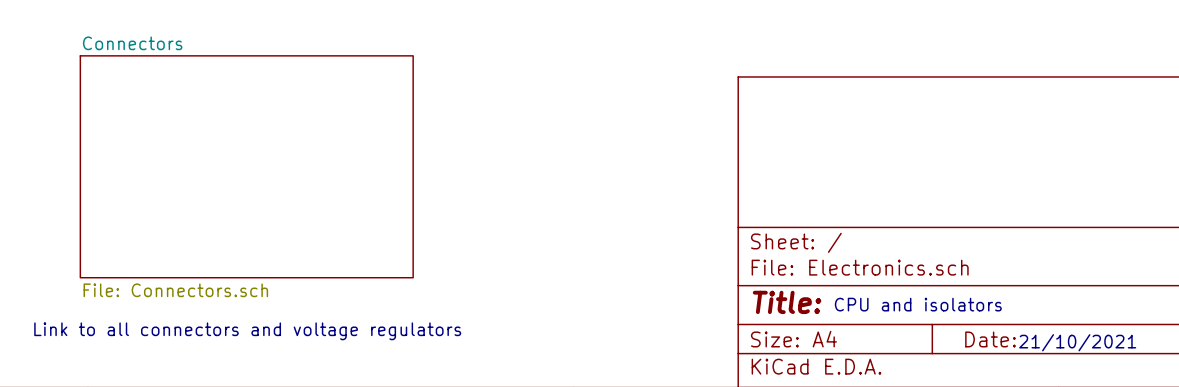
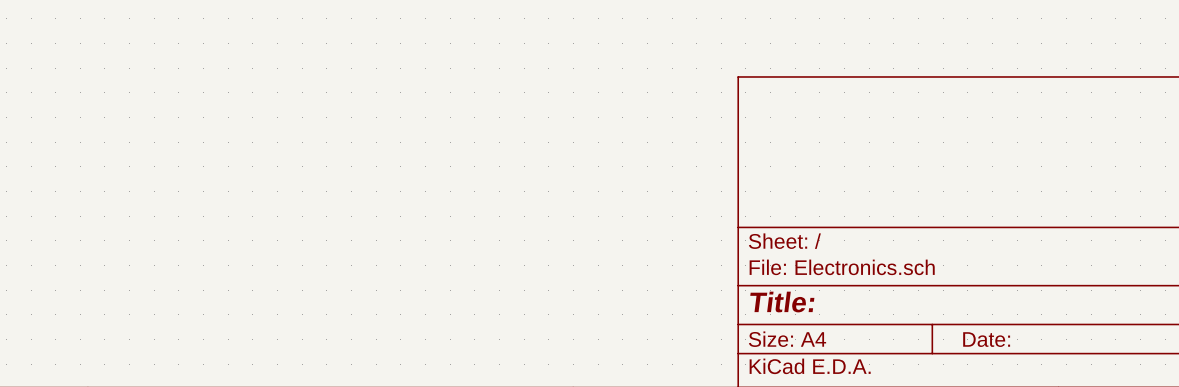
sheet Connectors: File: Connectors.sch (246, 166) -> none
text: CPU and isolators (918, 304) -> none
text: Link to all connectors and voltage regulators (247, 331) -> none
text: 21/10/2021 (1077, 342) -> none

